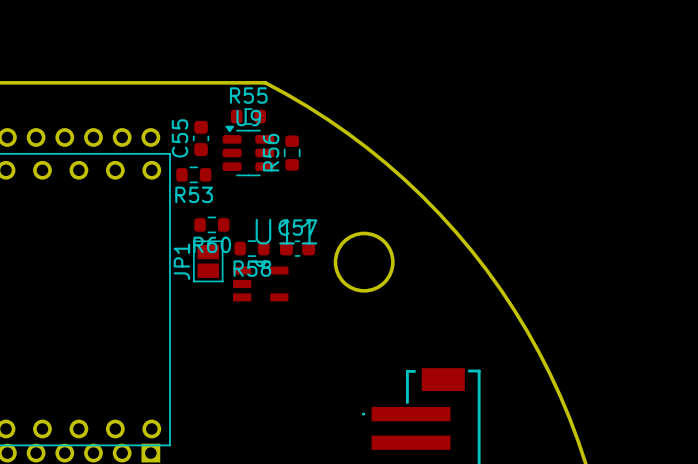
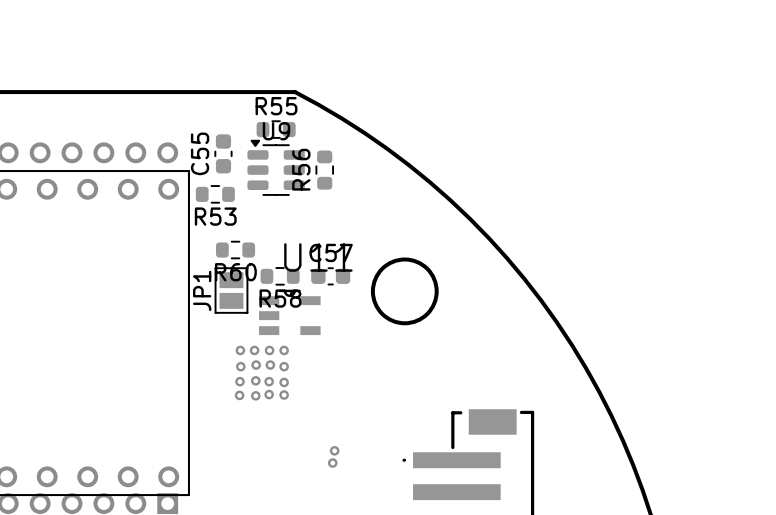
via: none -> (240, 350)
via: none -> (254, 350)
via: none -> (269, 350)
via: none -> (284, 350)
via: none -> (256, 365)
via: none -> (270, 365)
via: none -> (240, 366)
via: none -> (284, 366)
via: none -> (255, 380)
via: none -> (239, 381)
via: none -> (269, 381)
via: none -> (284, 382)
via: none -> (239, 395)
via: none -> (269, 394)
via: none -> (284, 395)
via: none -> (255, 395)
via: none -> (334, 450)
via: none -> (332, 463)

